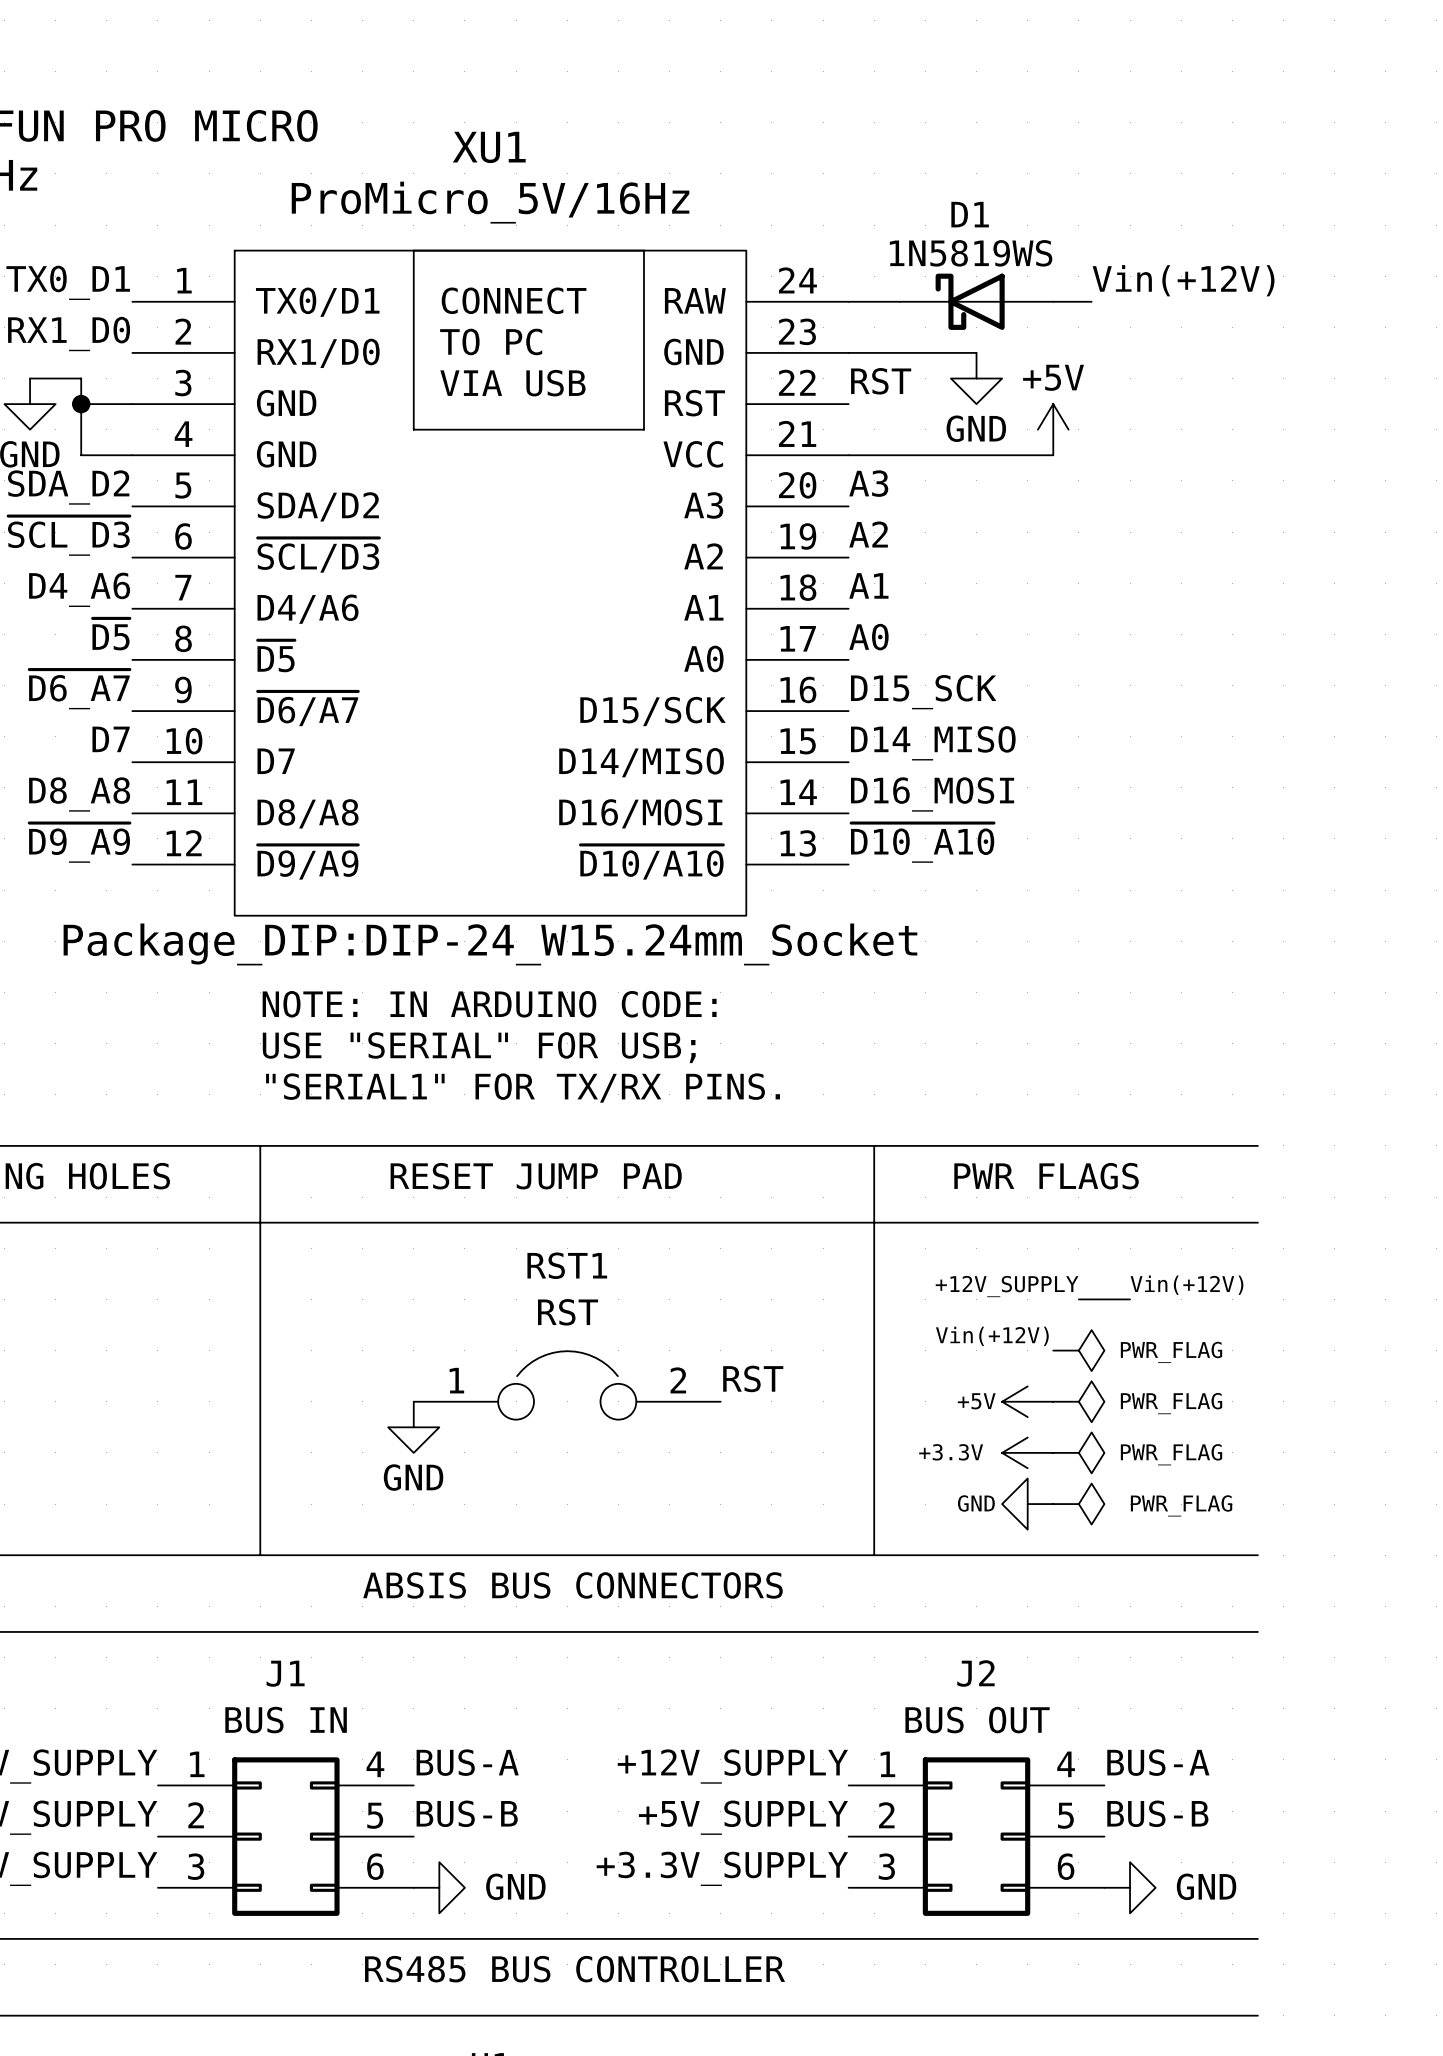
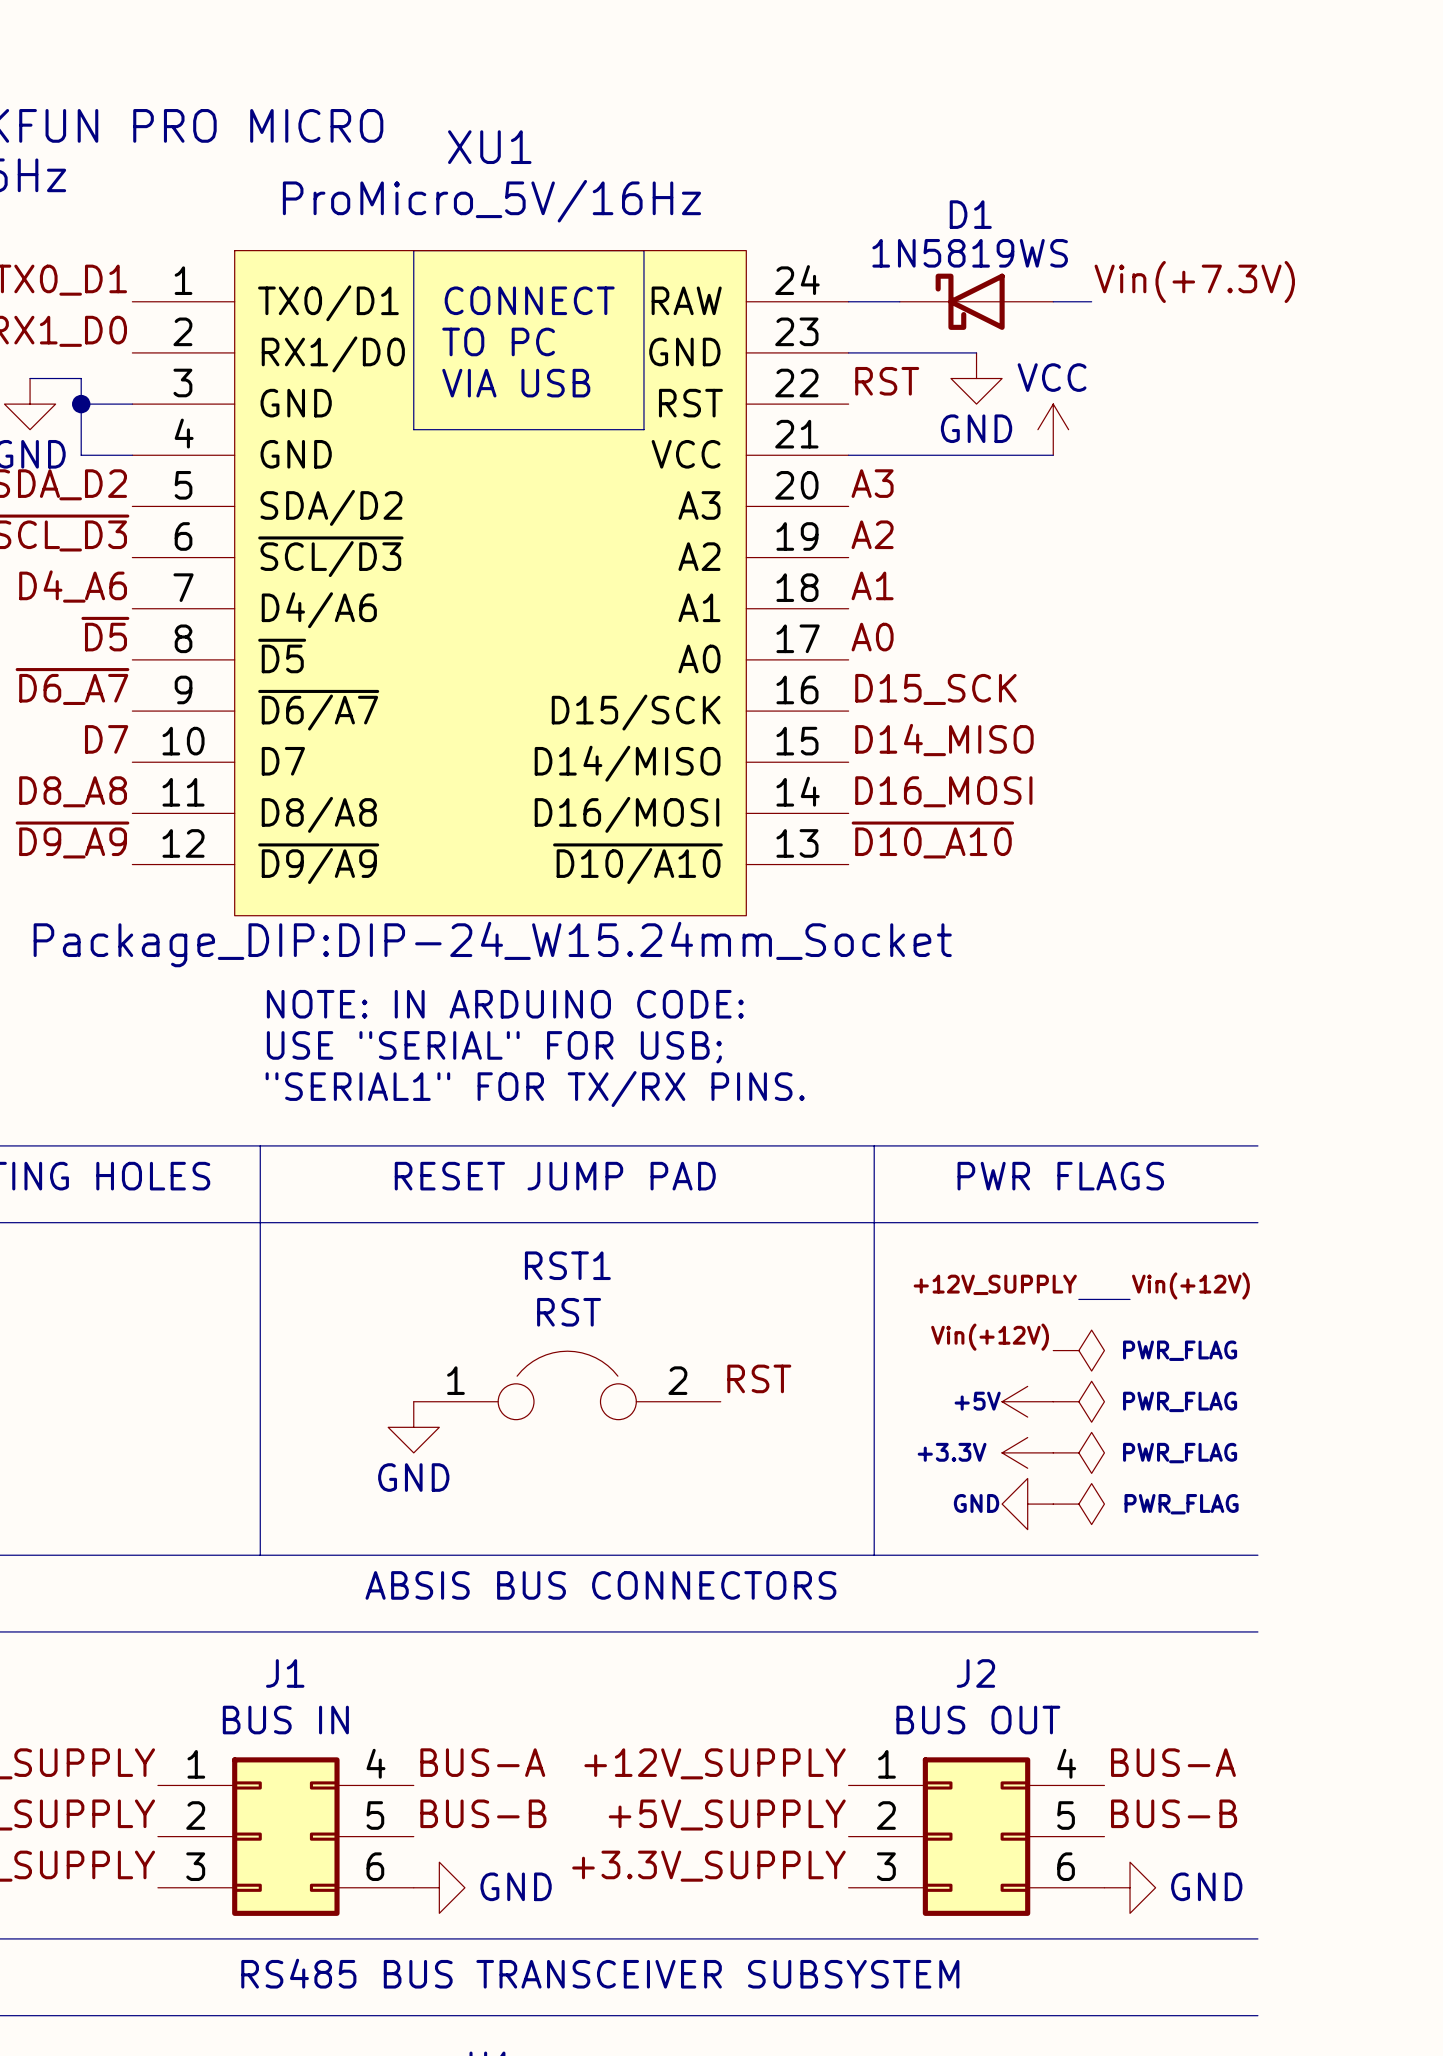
label: Vin(+12V) (1183, 280) -> Vin(+7.3V) (1194, 281)
power symbol: +5V (1053, 429) -> VCC (1053, 429)
text: RS485 BUS CONTROLLER (575, 1969) -> none
text: none -> RS485 BUS TRANSCEIVER SUBSYSTEM (600, 1973)

